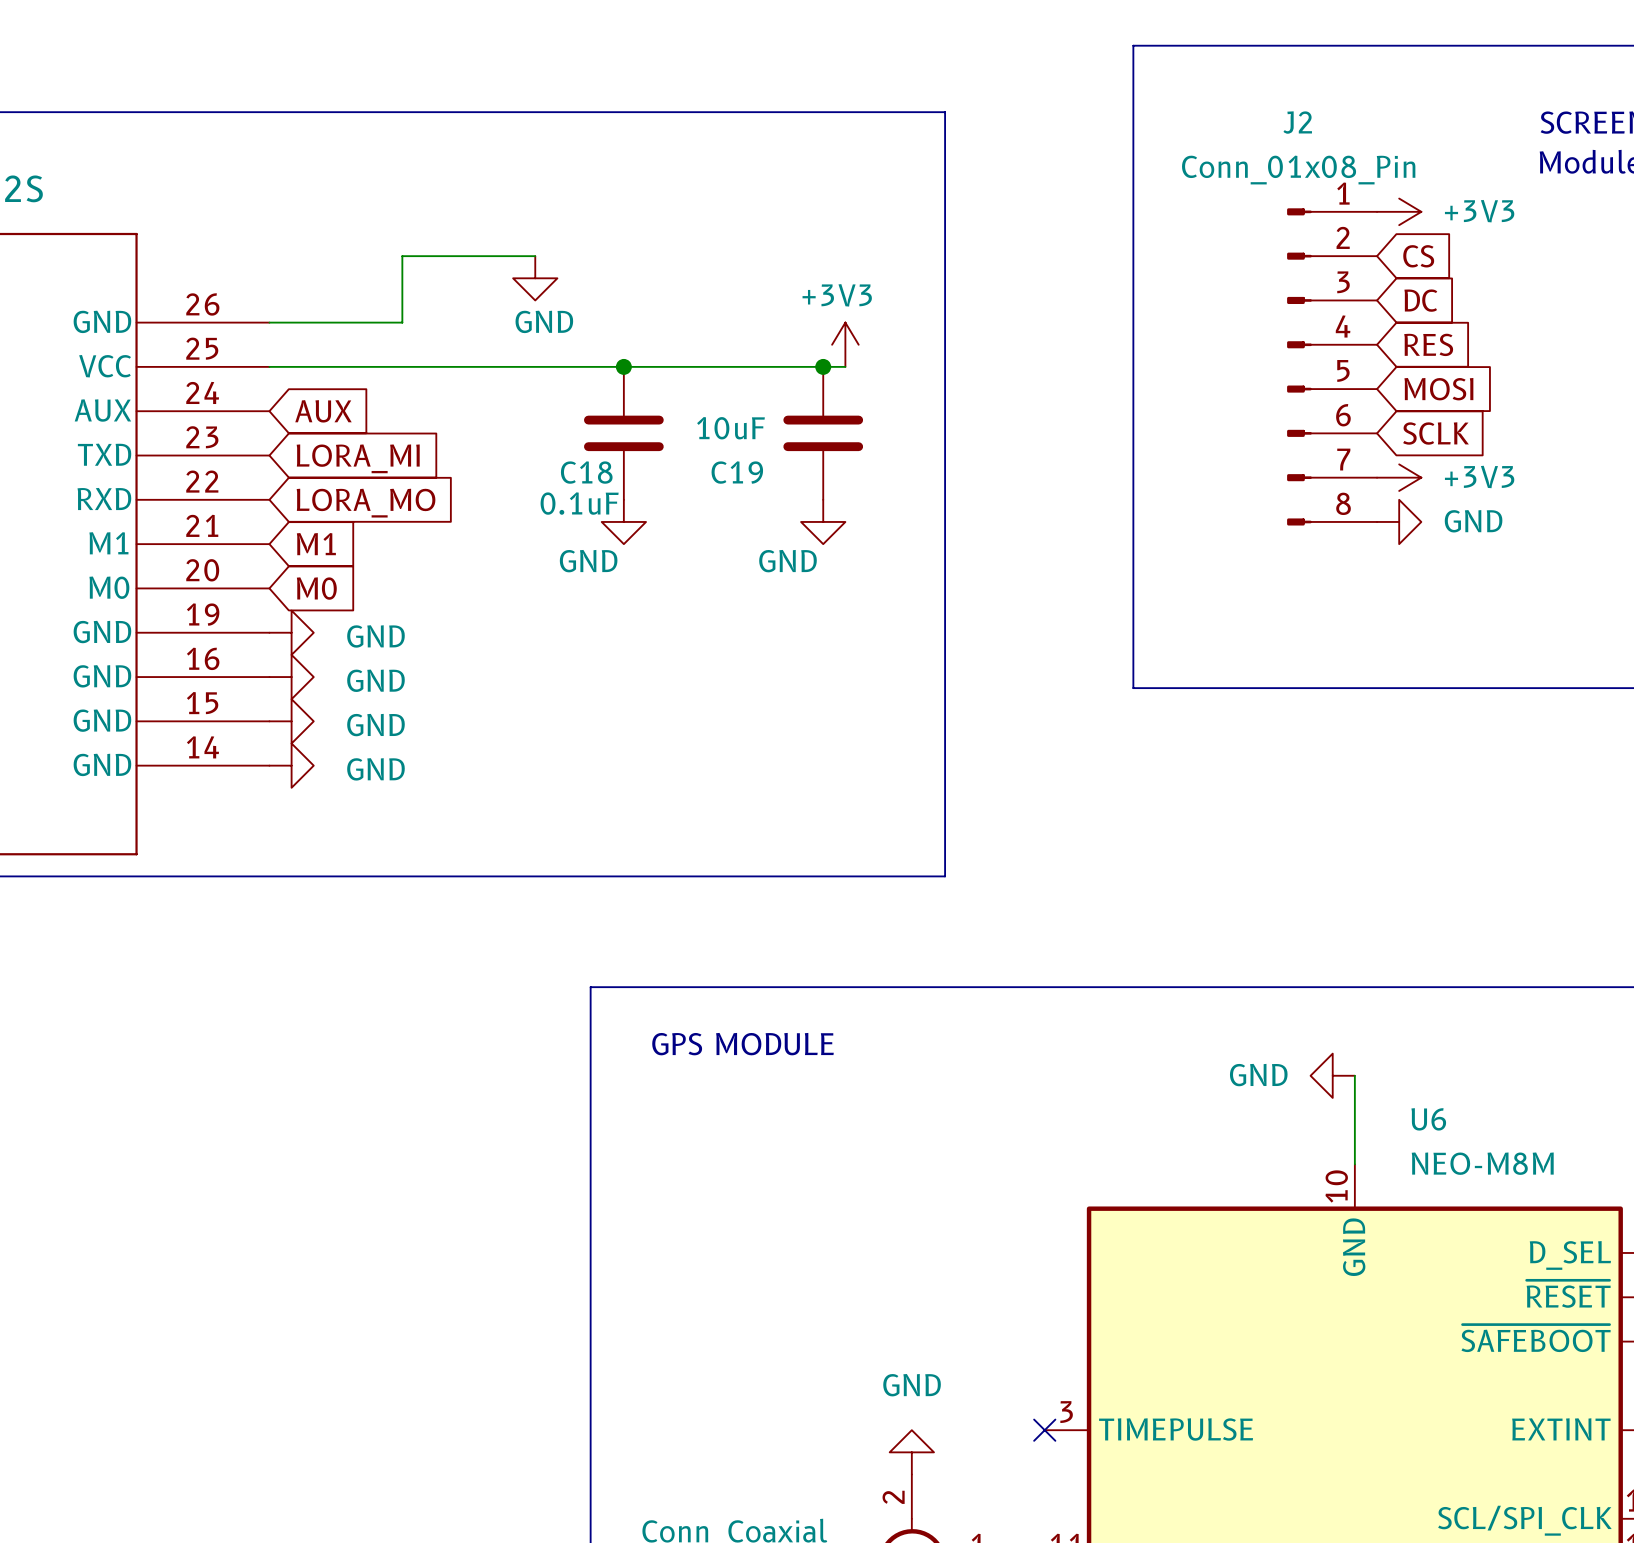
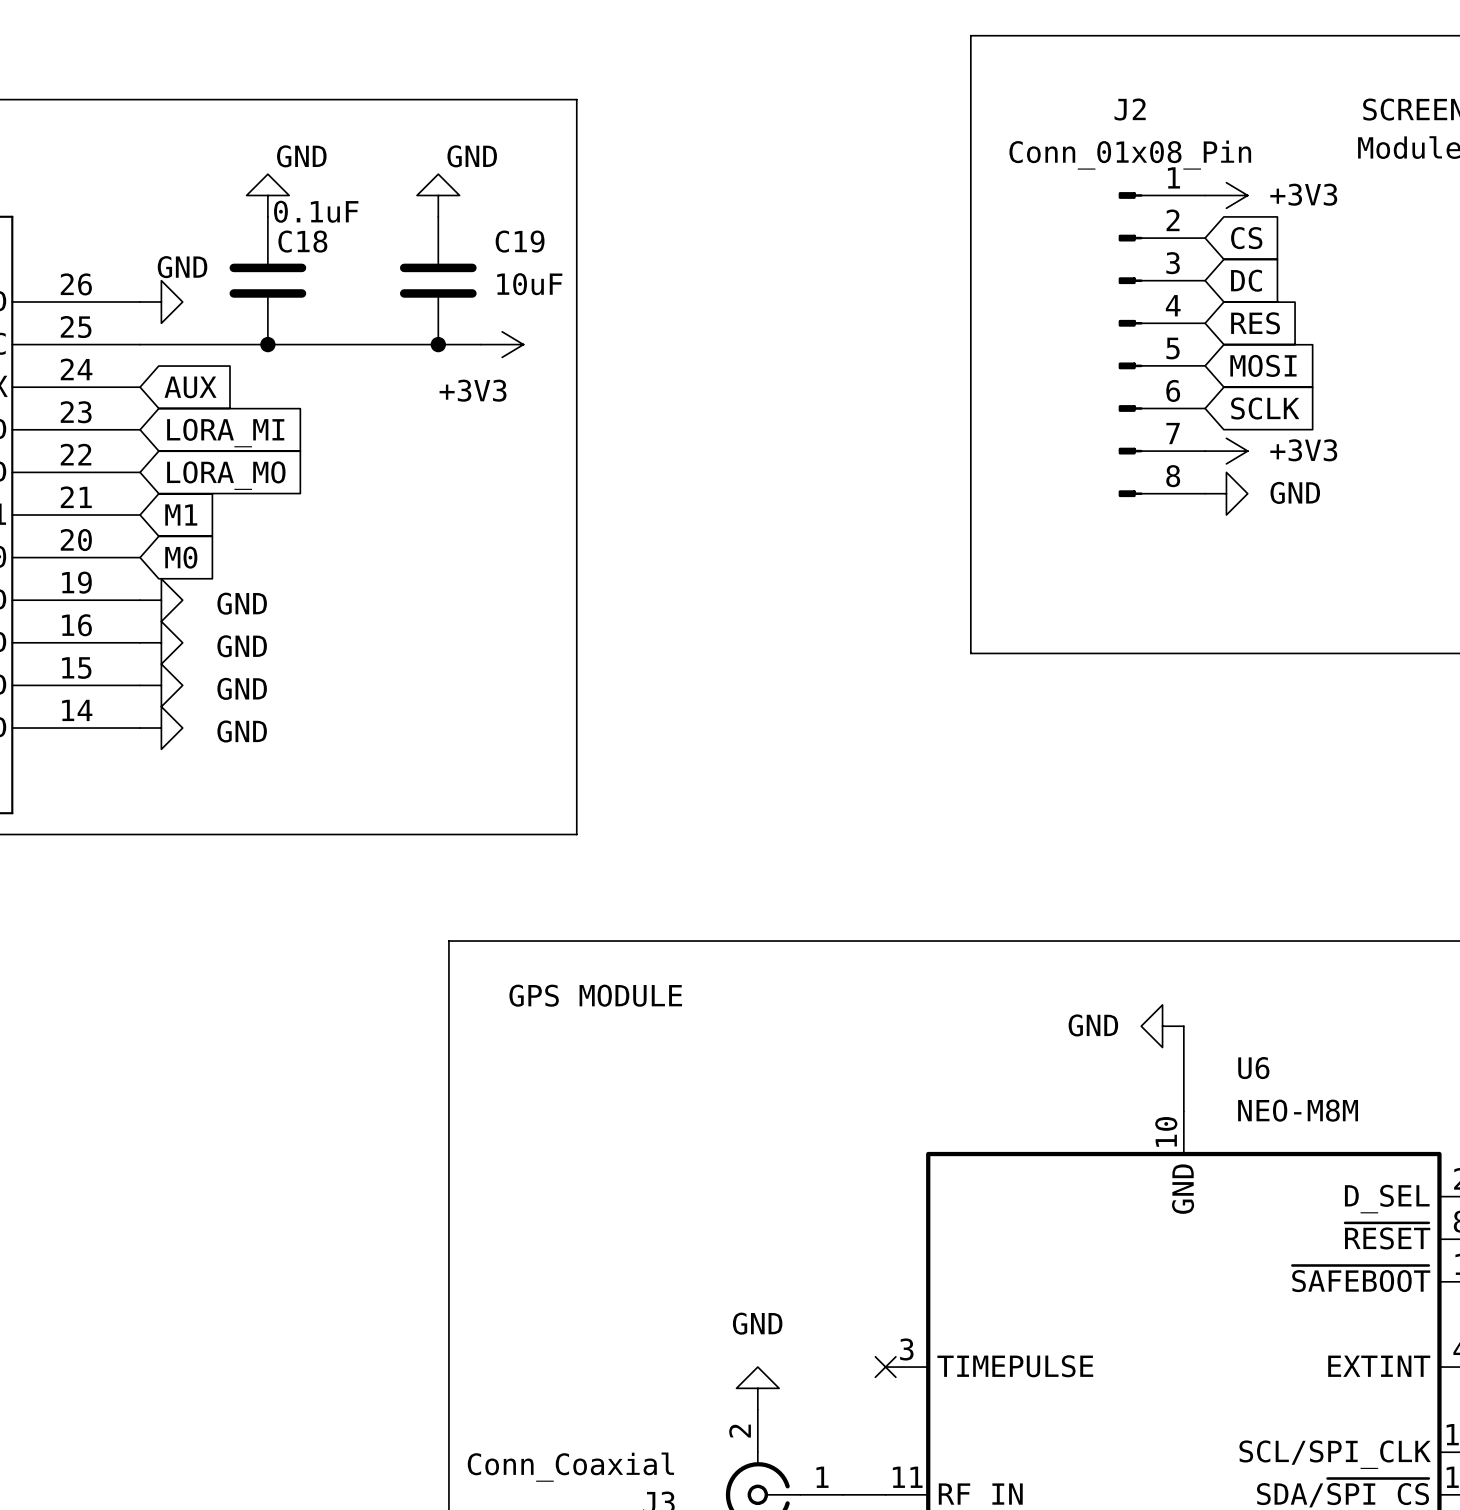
line: (723, 112) (945, 112) (945, 876) (723, 876) -> (576, 99) (576, 834)
power symbol: none -> GND (267, 195)
power symbol: none -> GND (438, 195)
wire: (535, 256) (402, 256) (402, 322) (269, 322) -> none
power symbol: GND (535, 278) -> none
power symbol text position: +3V3 (837, 295) -> +3V3 (473, 390)
power symbol: none -> GND (161, 301)
power symbol rotation: 0° (845, 344) -> 90° clockwise (502, 344)
power symbol position: +3V3 (845, 344) -> +3V3 (502, 344)
junction: none -> (267, 344)
wire: (623, 366) (845, 366) -> none
junction position: (623, 366) -> (438, 344)
junction: (823, 366) -> none
C19 value position: 10uF (730, 428) -> 10uF (529, 284)
C18 position: (623, 433) -> (267, 280)
C19 position: (823, 433) -> (438, 280)
C18 name position: C18 (586, 472) -> C18 (302, 241)
C19 name position: C19 (737, 472) -> C19 (520, 241)
C18 value position: 0.1uF (579, 503) -> 0.1uF (316, 211)
power symbol: GND (623, 521) -> none
power symbol: GND (823, 521) -> none

